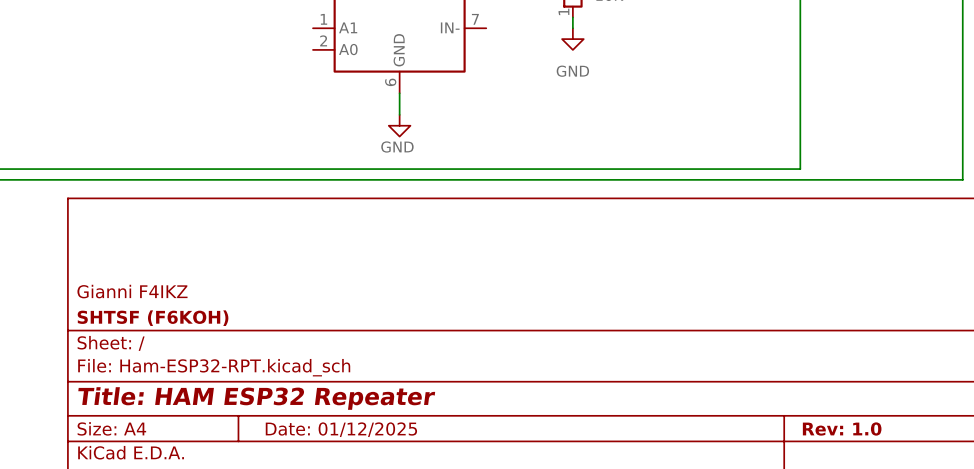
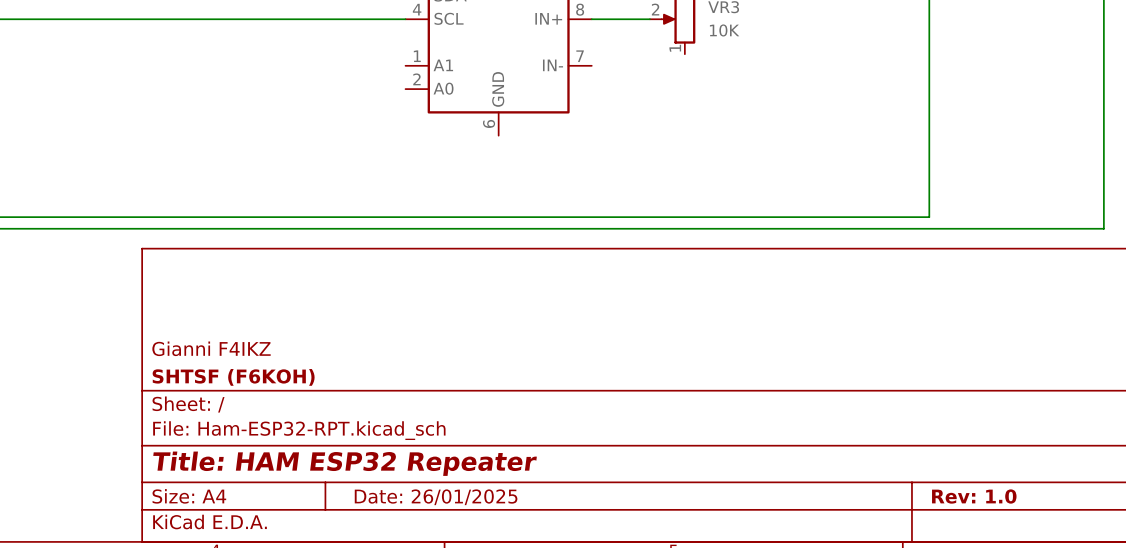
wire: (572, 17) (572, 28) -> none
power symbol: GND (572, 39) -> none
wire: (399, 93) (399, 114) -> none
power symbol: GND (399, 125) -> none
title block: Date: 01/12/2025 (341, 429) -> Date: 26/01/2025 (436, 497)

